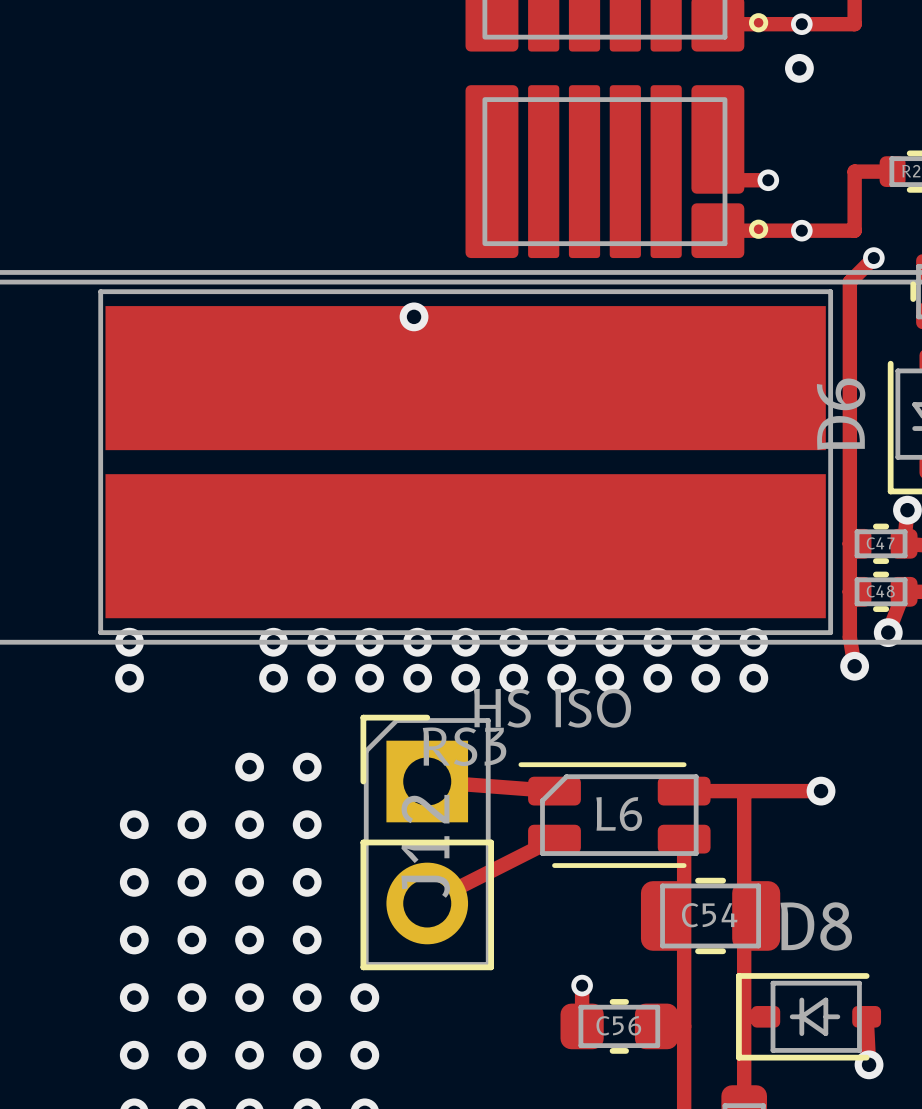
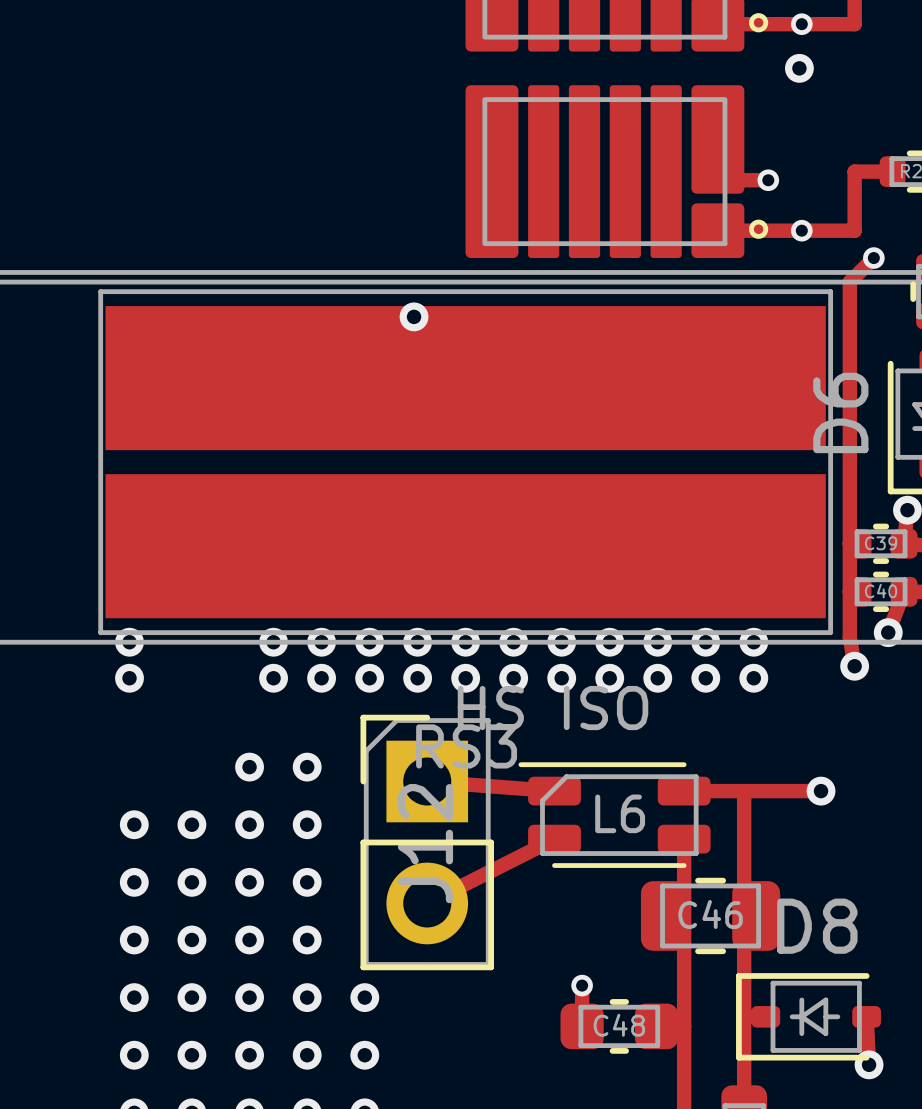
C47 name: C47 (880, 543) -> C39 (881, 543)
C48 name: C48 (880, 591) -> C40 (881, 591)
C54 name: C54 (709, 915) -> C46 (710, 914)
C56 name: C56 (618, 1025) -> C48 (619, 1025)

